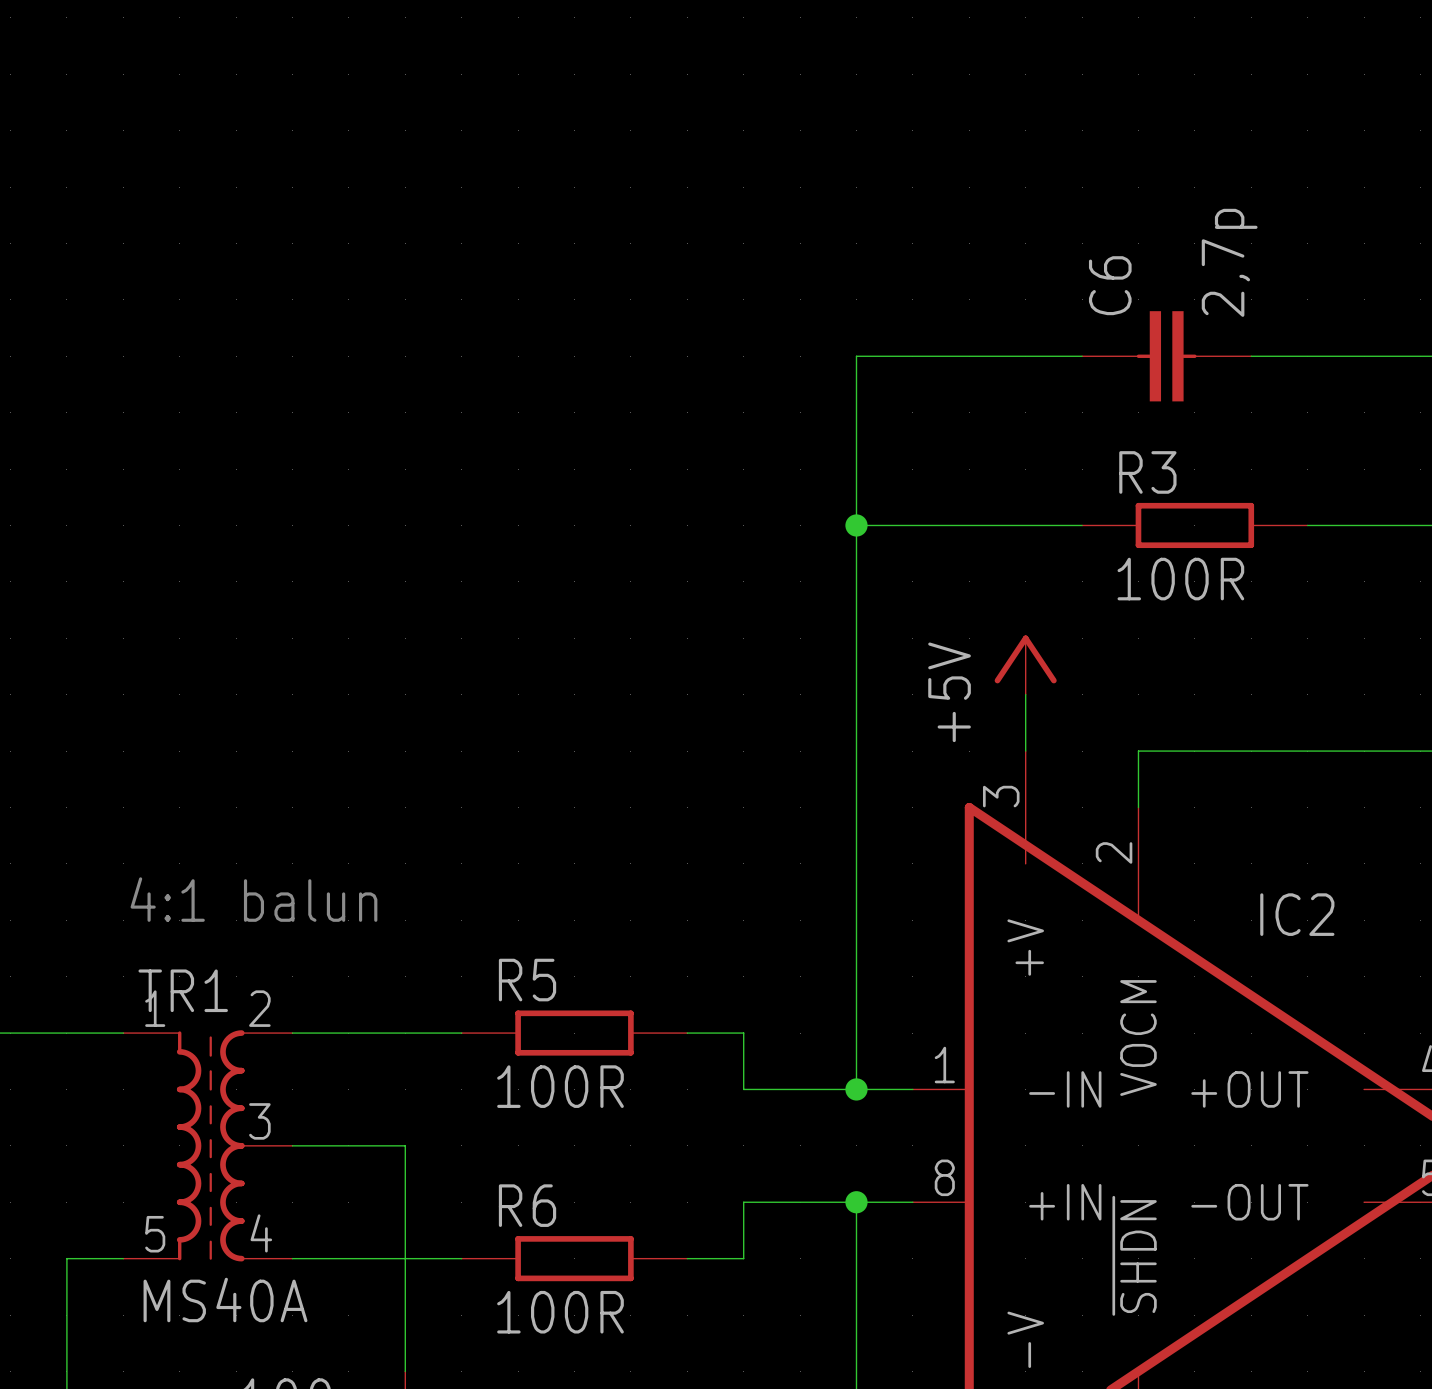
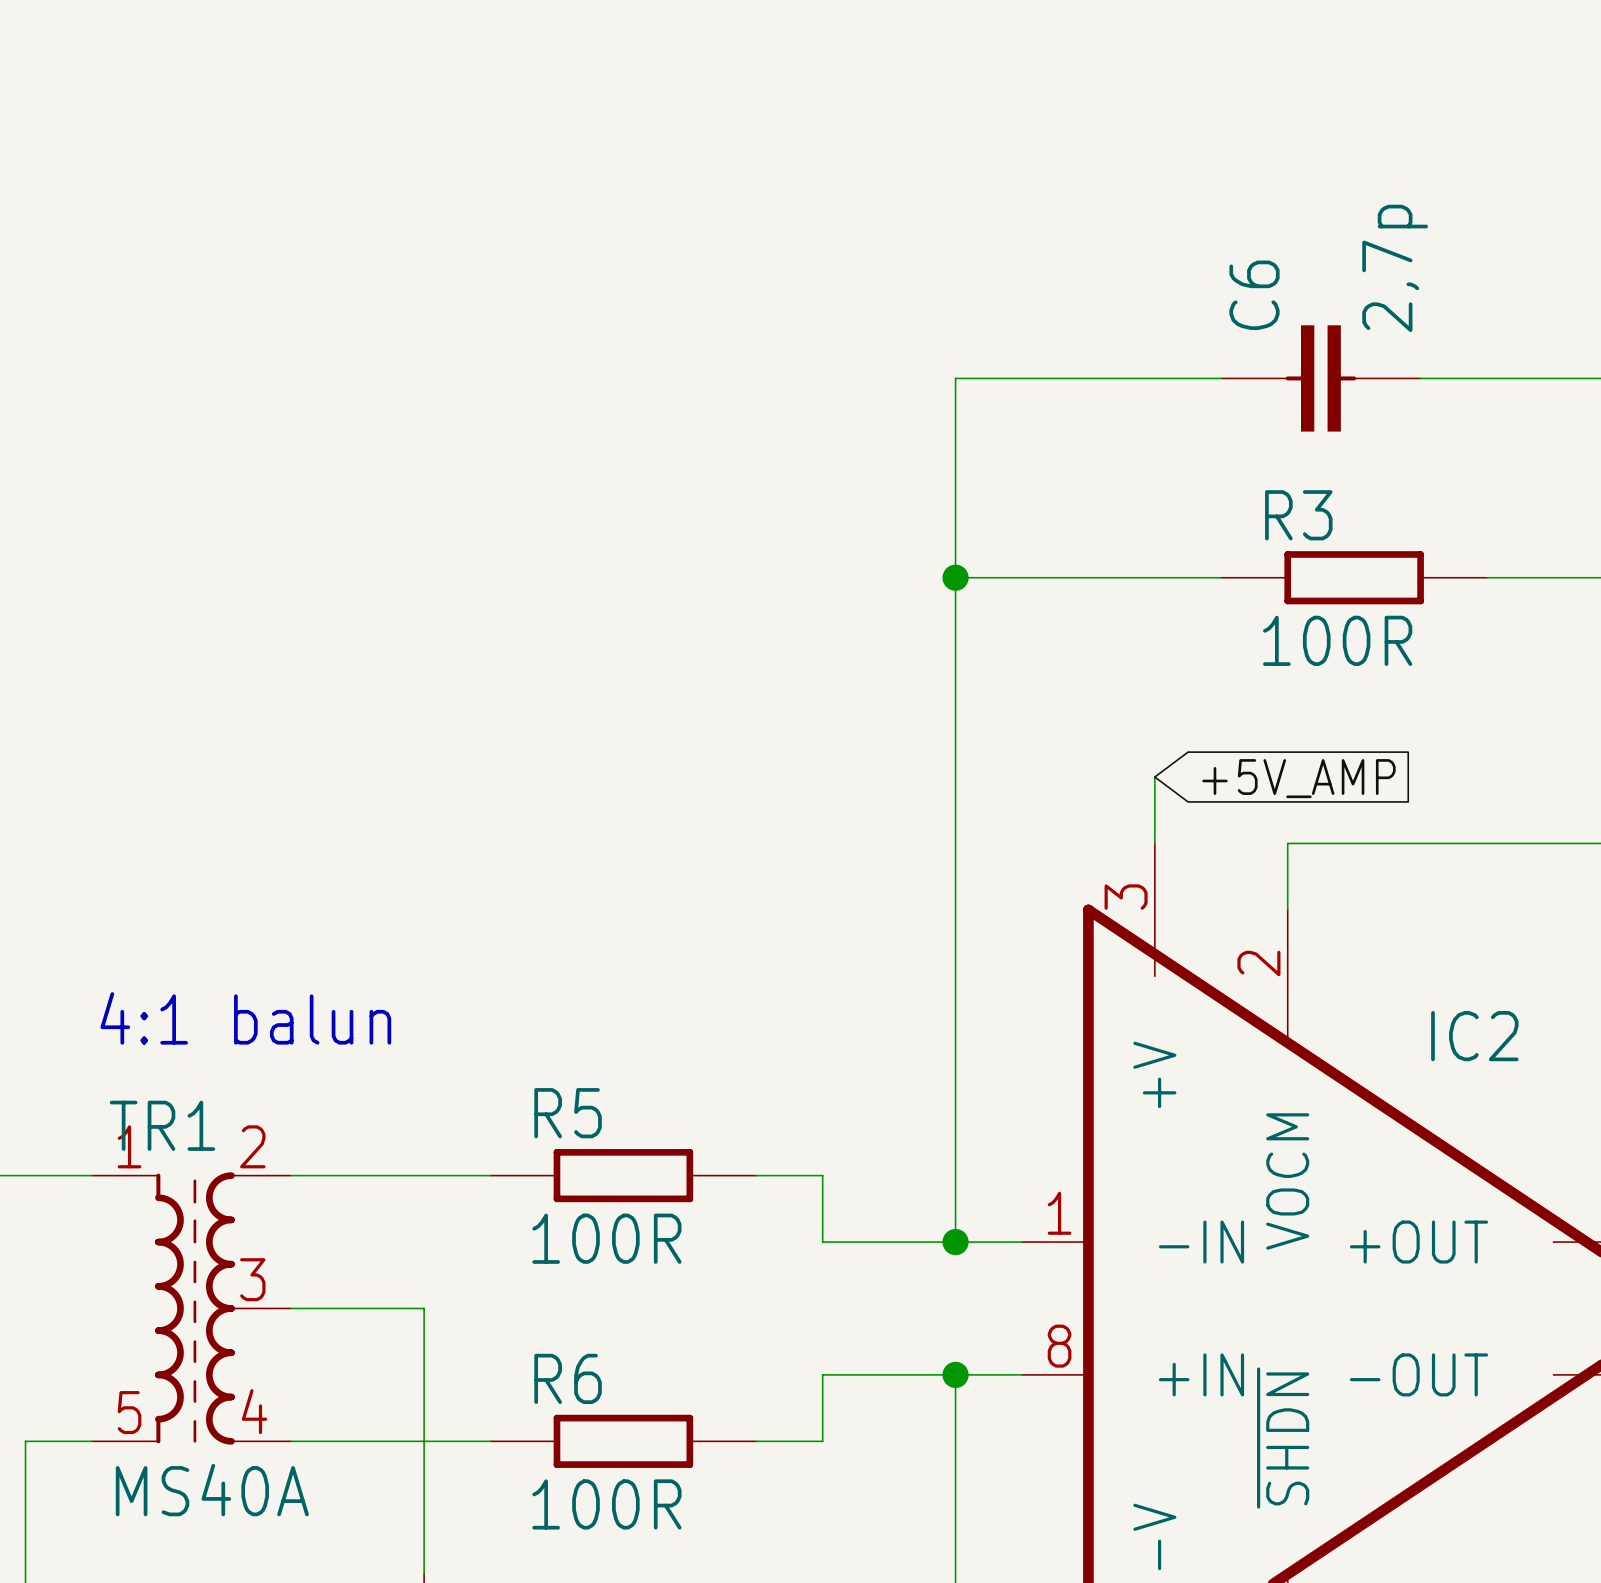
power symbol: +5V (1025, 665) -> none
global label: none -> +5V_AMP (1298, 778)

